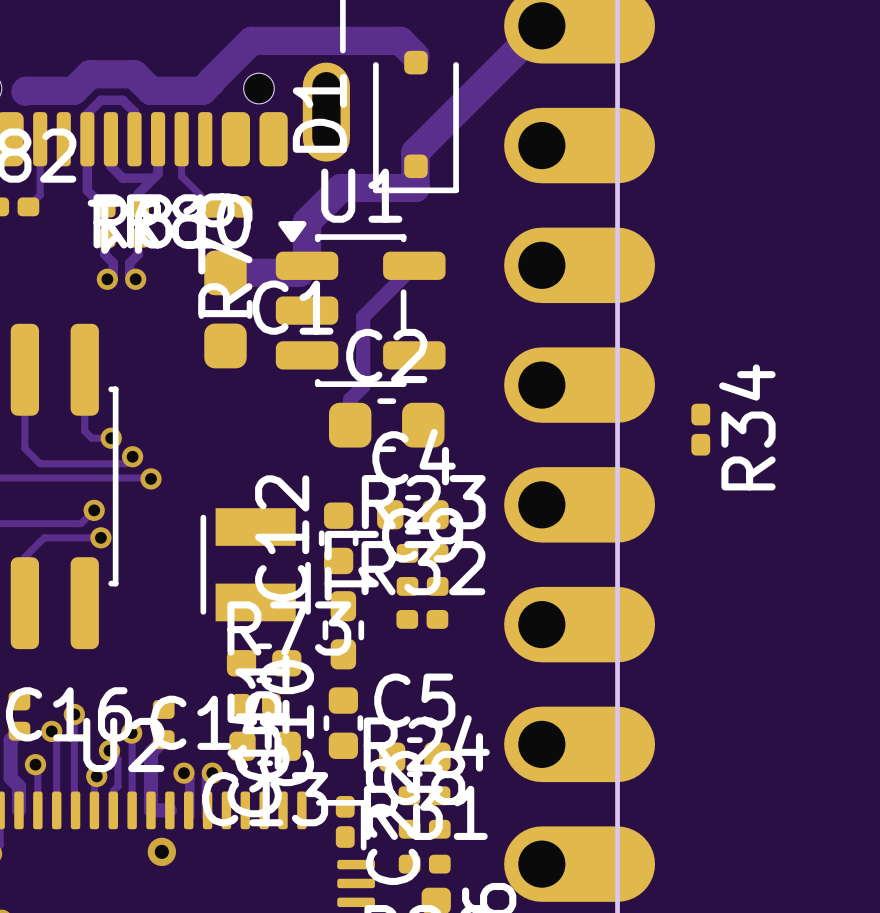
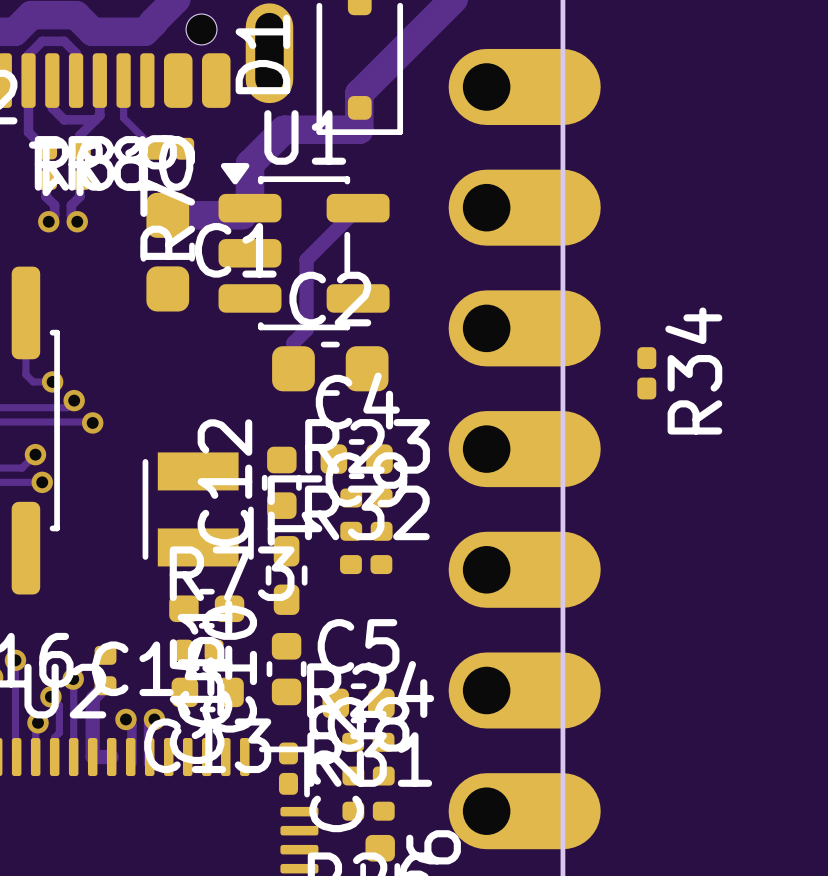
via: (161, 851) -> none

